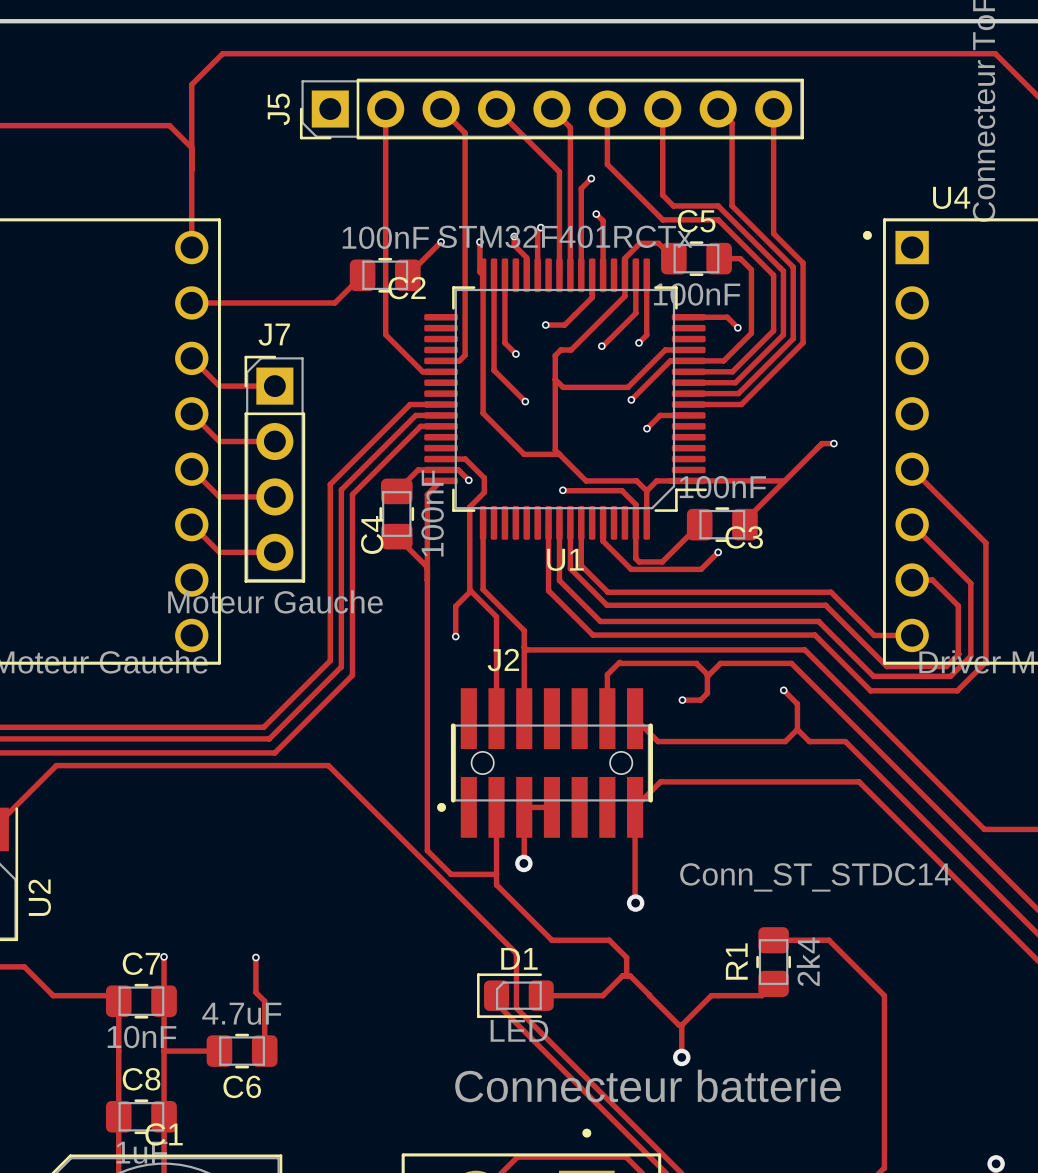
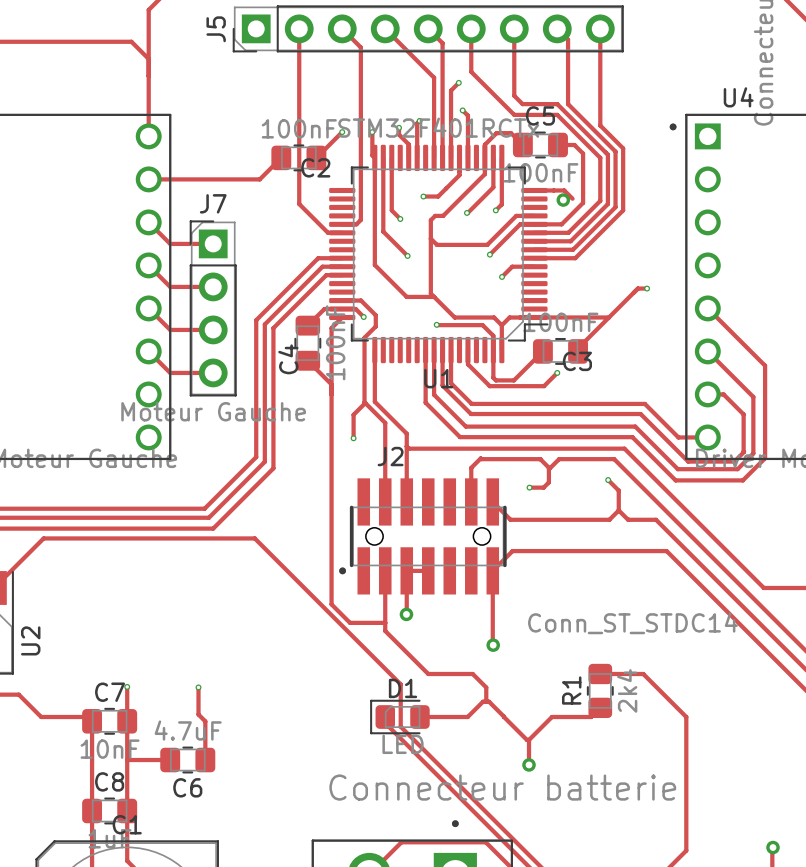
via size: [734, 324, 742, 332] -> [556, 193, 571, 207]

